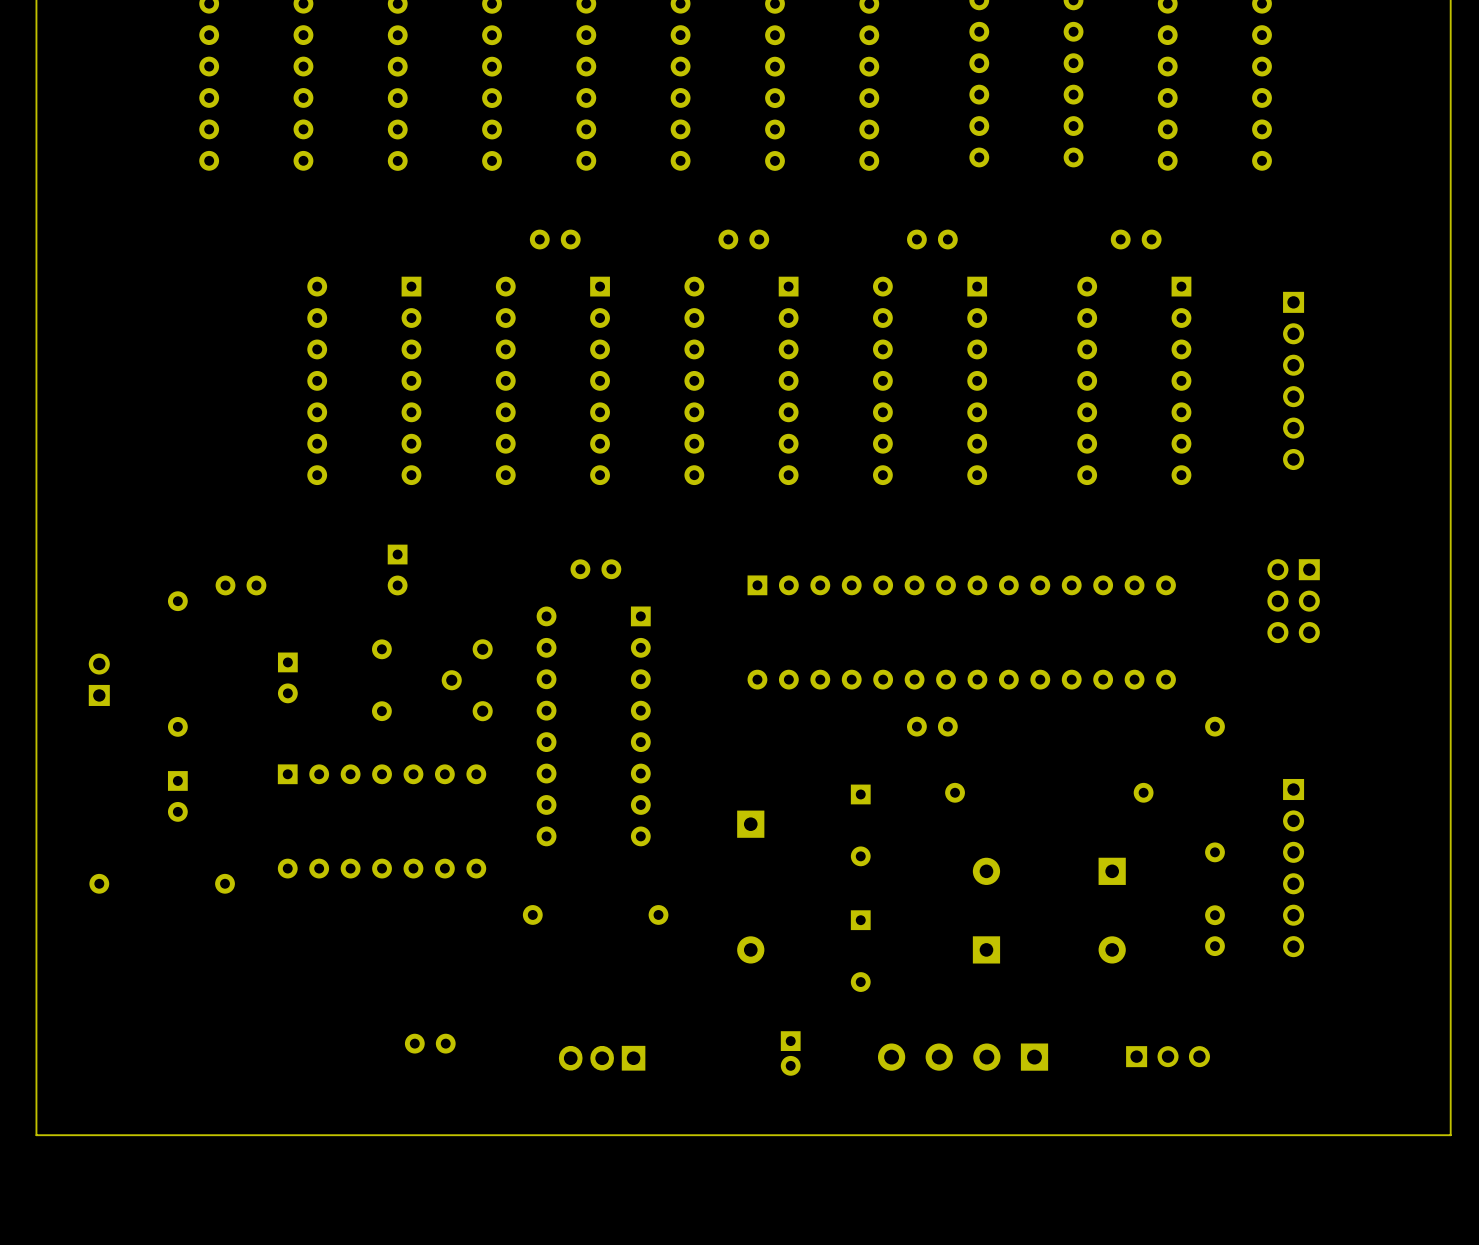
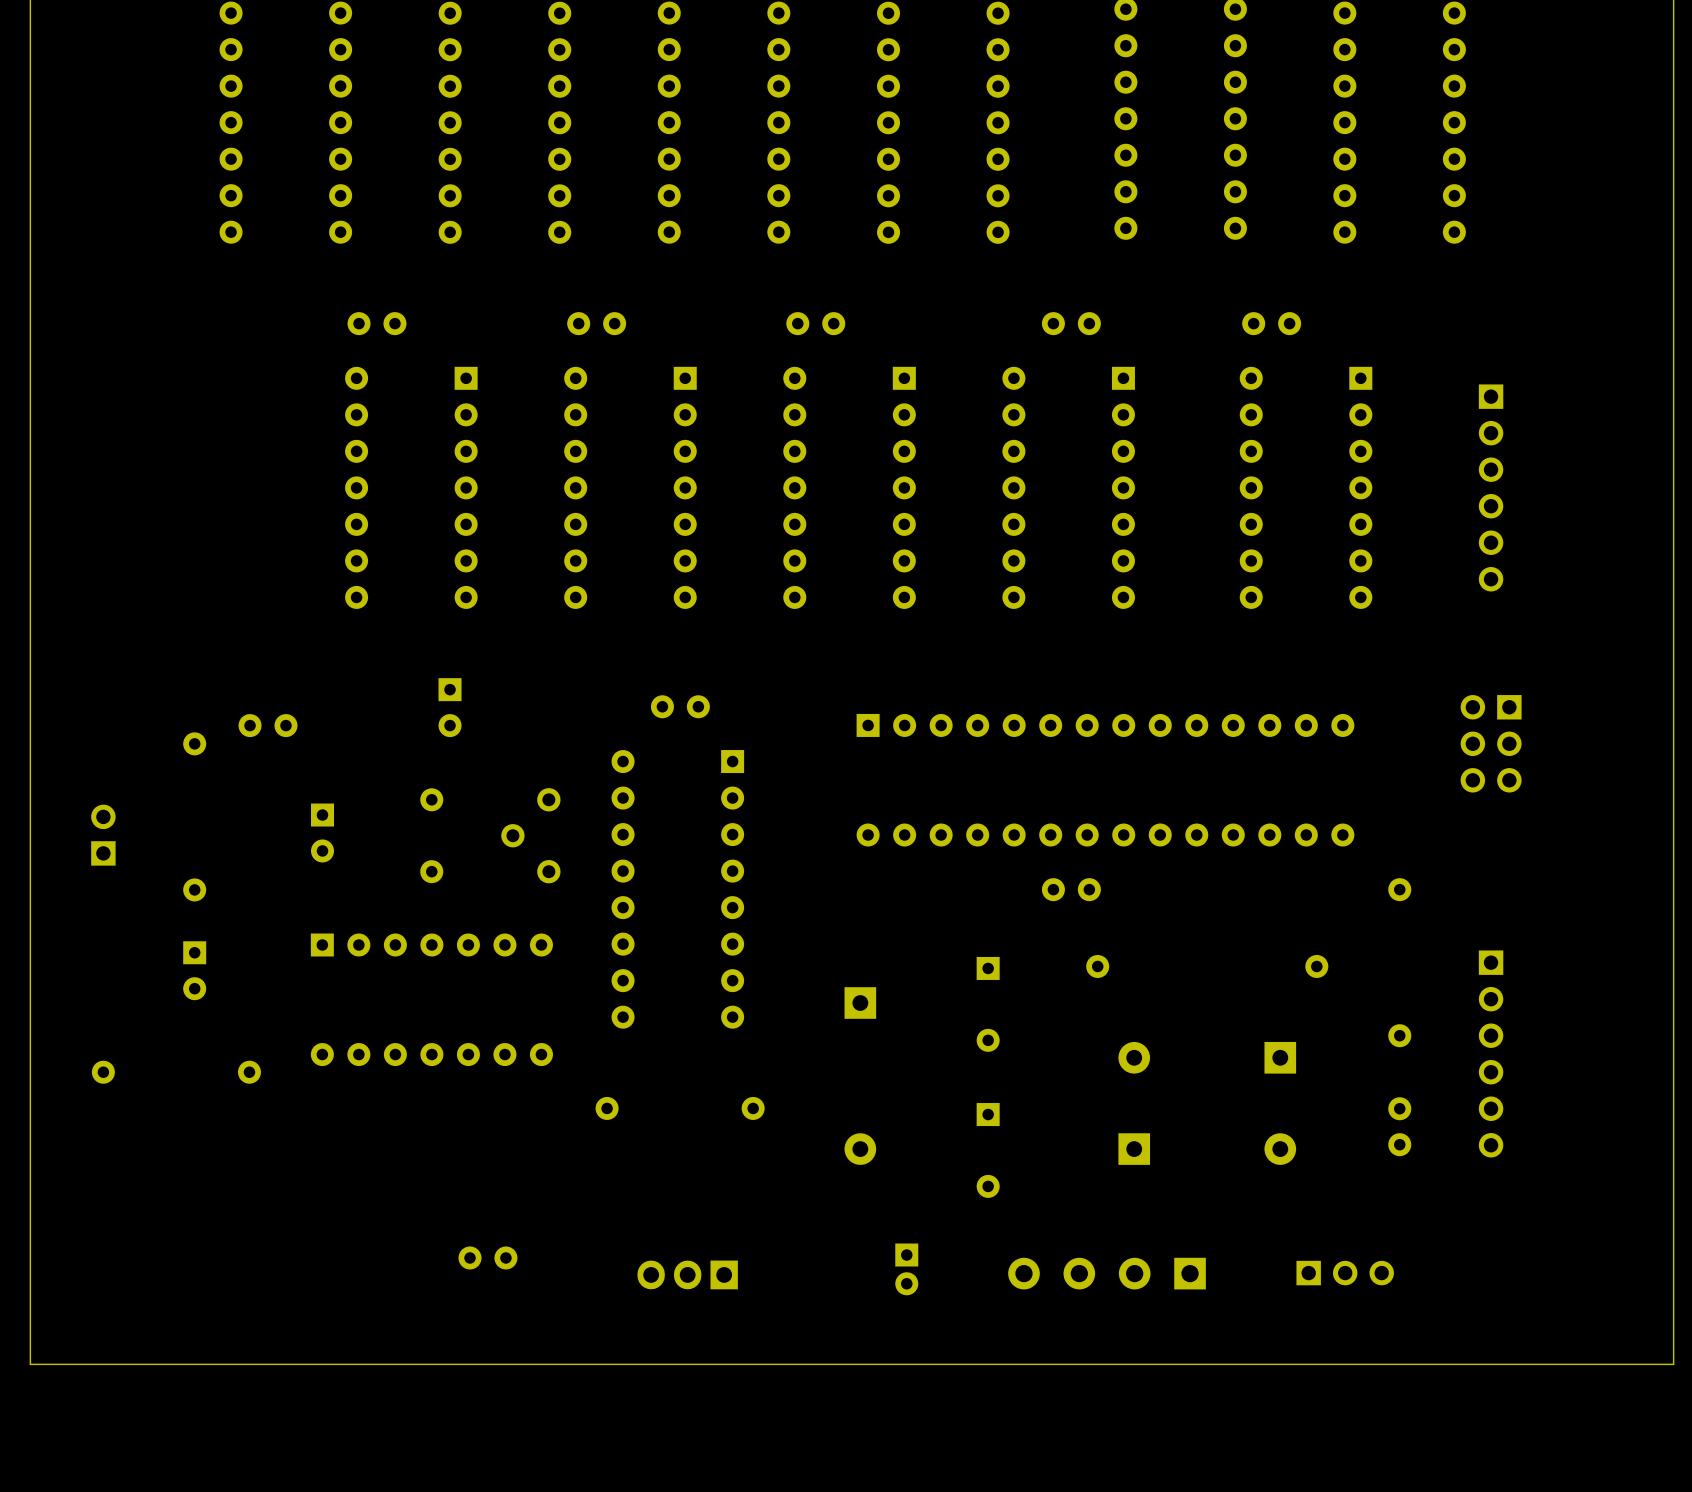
part: none -> (376, 323)
part position: (555, 239) -> (596, 323)
part position: (743, 239) -> (815, 323)
part position: (1136, 239) -> (1271, 323)

